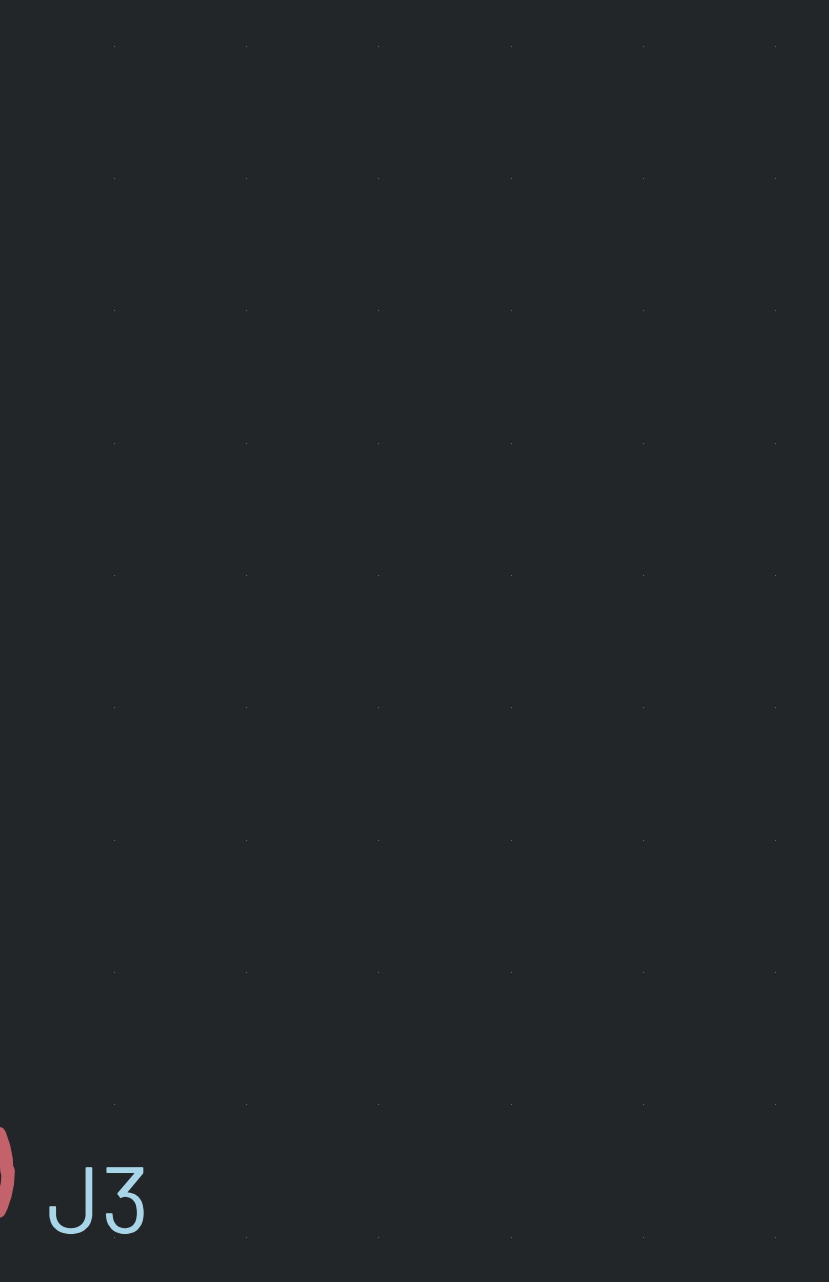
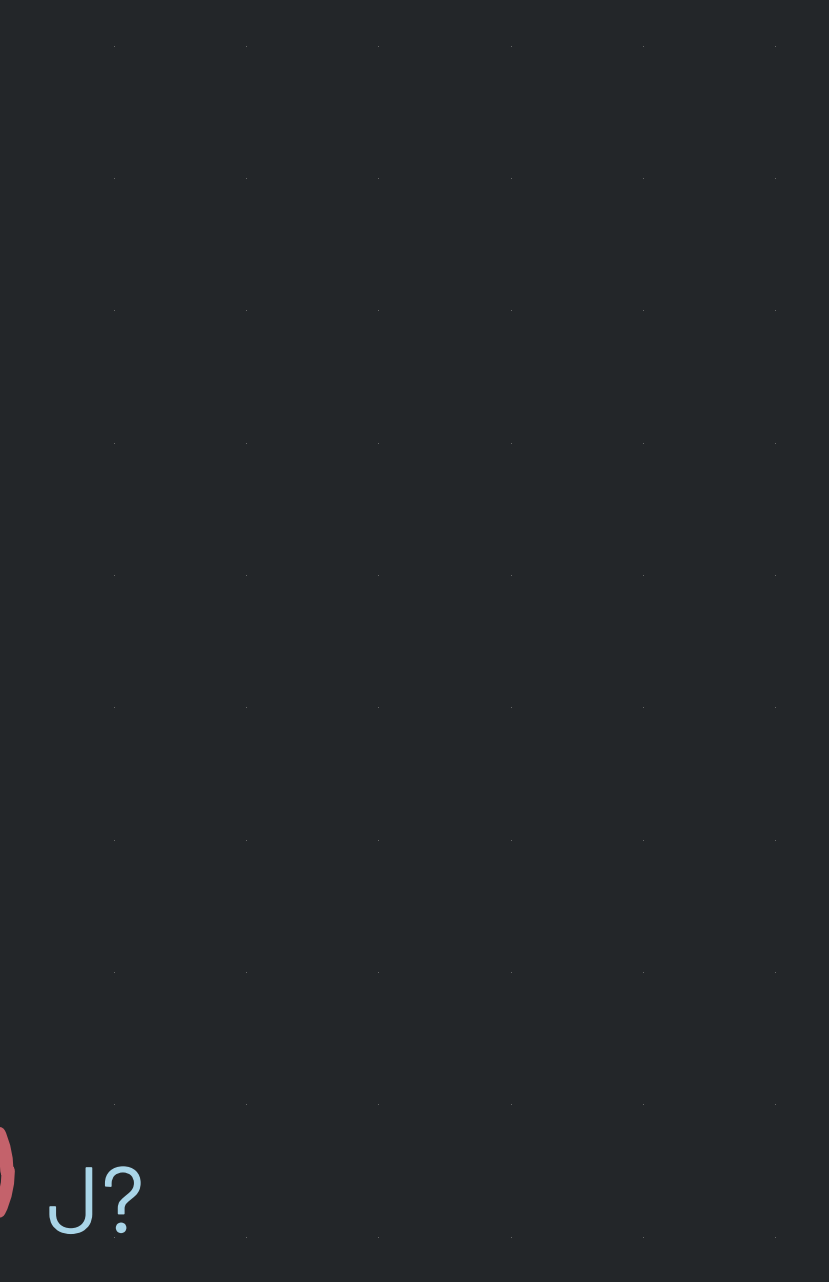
J3 name: J3 (96, 1200) -> J? (95, 1200)

